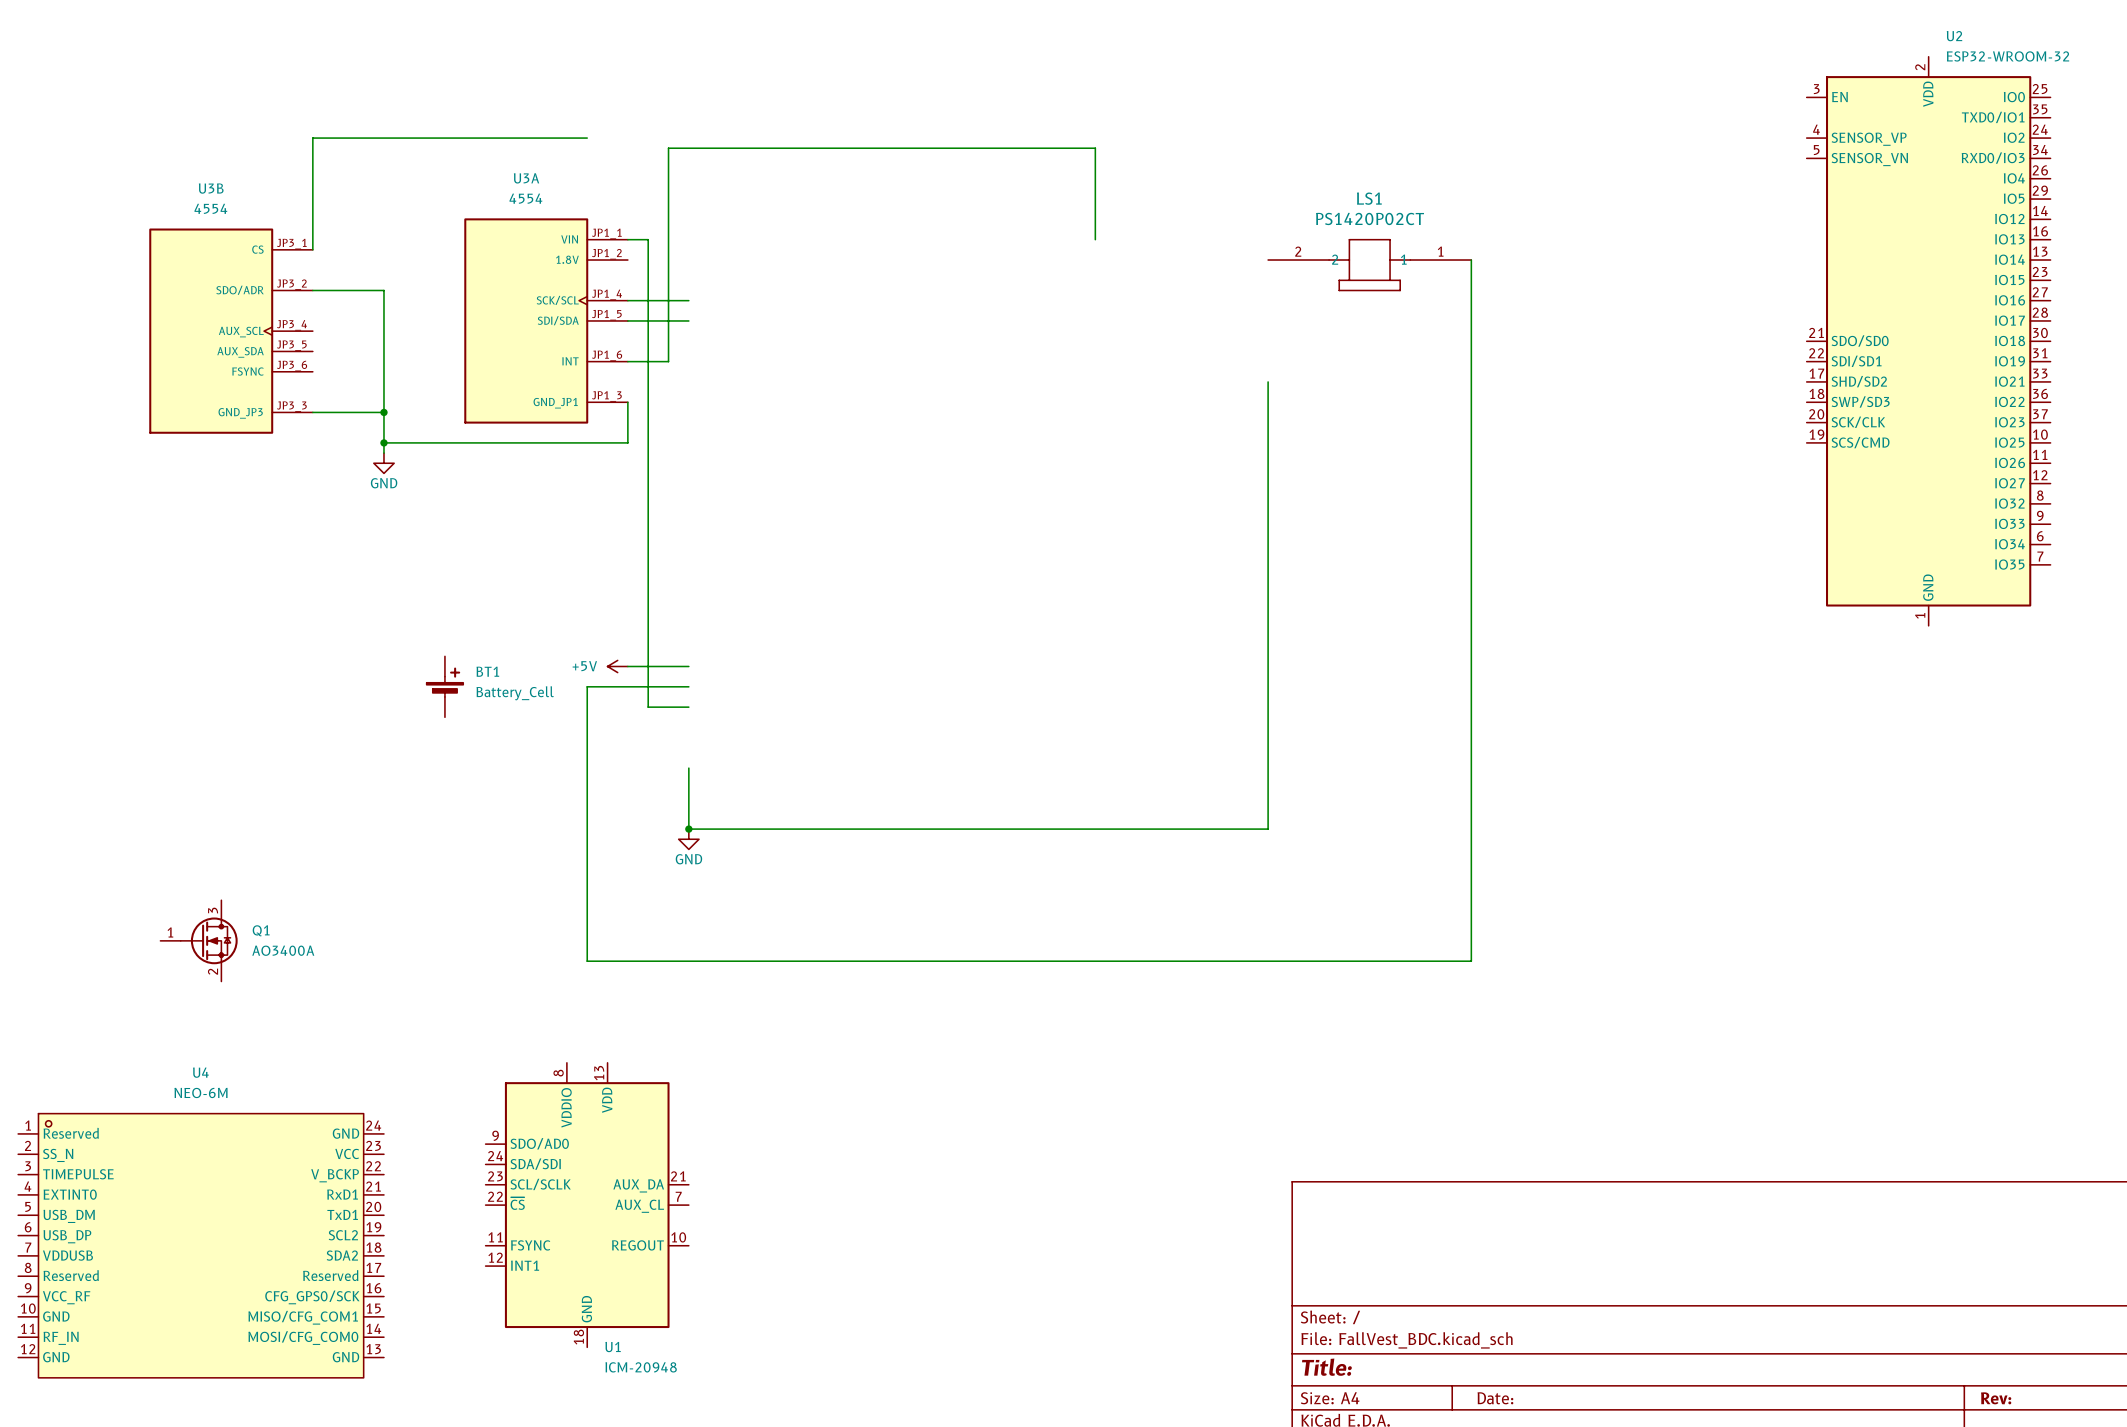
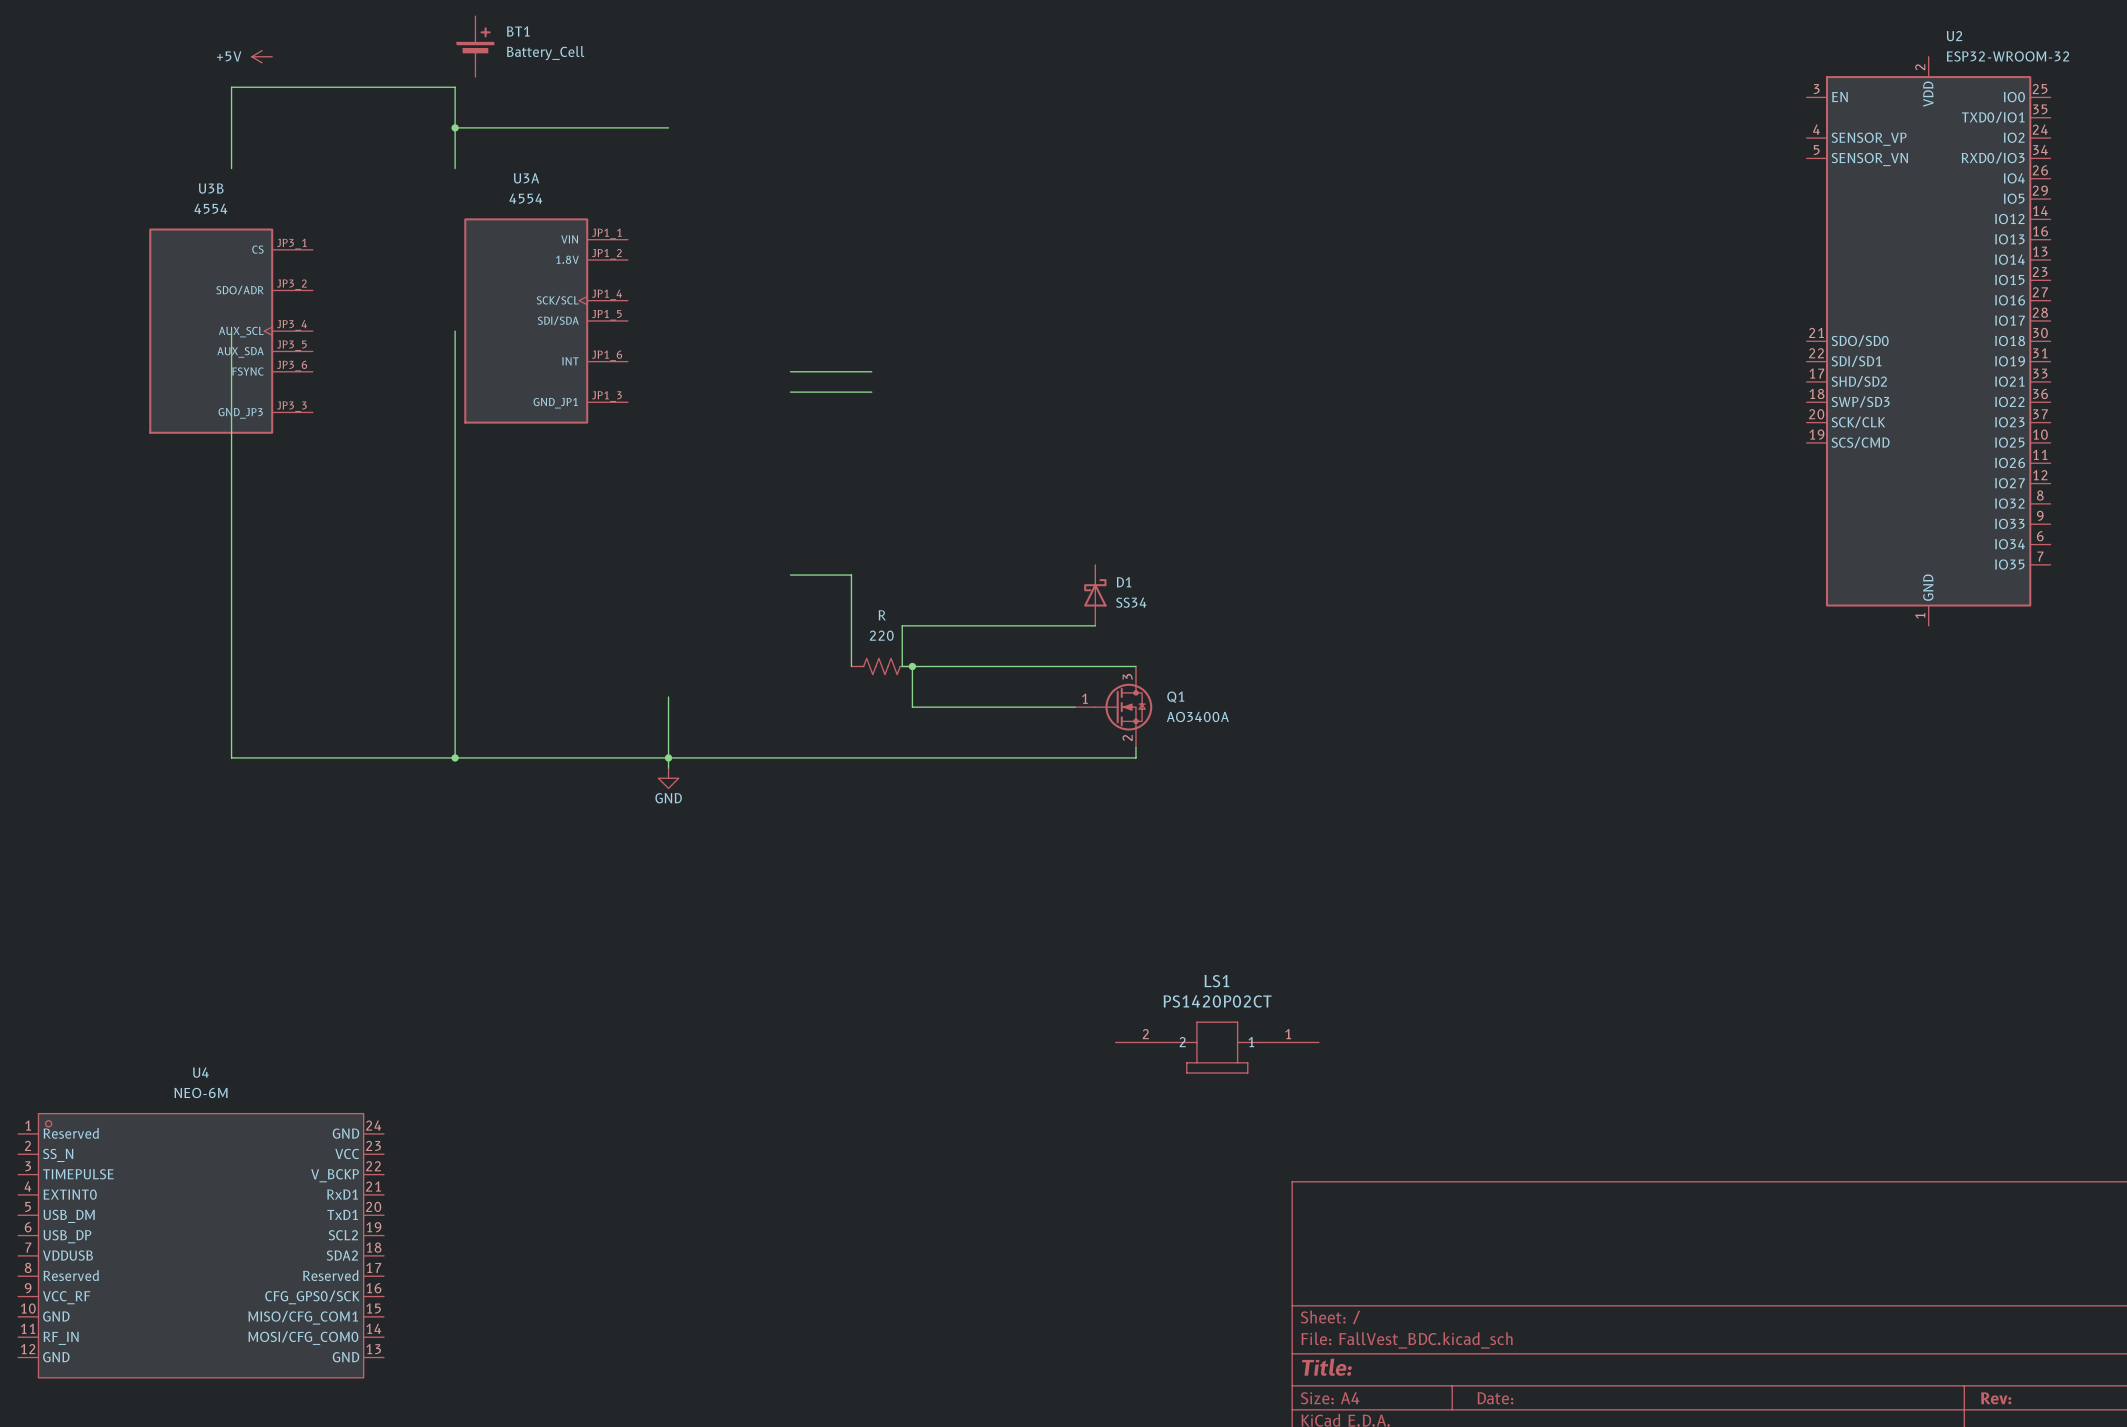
power symbol: none -> +5V (262, 56)
wire: none -> (455, 127) (668, 127)
junction: none -> (455, 127)
wire: (587, 138) (312, 138) (312, 249) -> none
wire: none -> (231, 168) (231, 87) (455, 87) (455, 168)
wire: (627, 239) (648, 239) (648, 707) (688, 707) -> none
wire: (1095, 239) (1095, 148) (668, 148) (668, 361) (627, 361) -> none
wire: (1471, 260) (1471, 961) (587, 961) (587, 686) (688, 686) -> none
LS1 position: (1369, 265) -> (1217, 1047)
wire: (312, 290) (383, 290) (383, 453) -> none
wire: (627, 300) (688, 300) -> none
wire: (627, 320) (688, 320) -> none
wire: none -> (231, 331) (231, 757) (1135, 757) (1135, 747)
wire: none -> (455, 331) (455, 757)
wire: none -> (790, 371) (871, 371)
wire: (1268, 381) (1268, 829) (688, 829) (688, 768) -> none
wire: none -> (790, 392) (871, 392)
wire: (627, 402) (627, 442) (383, 442) -> none
wire: (312, 412) (383, 412) -> none
junction: (383, 412) -> none
junction: (383, 442) -> none
power symbol: GND (383, 463) -> none
wire: none -> (790, 575) (851, 575) (851, 666)
D1: none -> SS34 (1095, 595)
wire: none -> (1095, 625) (902, 625) (902, 666) (1135, 666)
power symbol: +5V (617, 666) -> none
wire: (627, 666) (688, 666) -> none
R: none -> 220 (881, 666)
wire: none -> (912, 666) (912, 707) (1075, 707)
junction: none -> (912, 666)
BT1 position: (444, 686) -> (475, 46)
wire: none -> (668, 696) (668, 768)
junction: none -> (455, 757)
junction: none -> (668, 757)
junction: (688, 829) -> none
power symbol position: GND (688, 839) -> GND (668, 778)
Q1 position: (199, 940) -> (1113, 707)
U1: ICM-20948 (587, 1205) -> none

